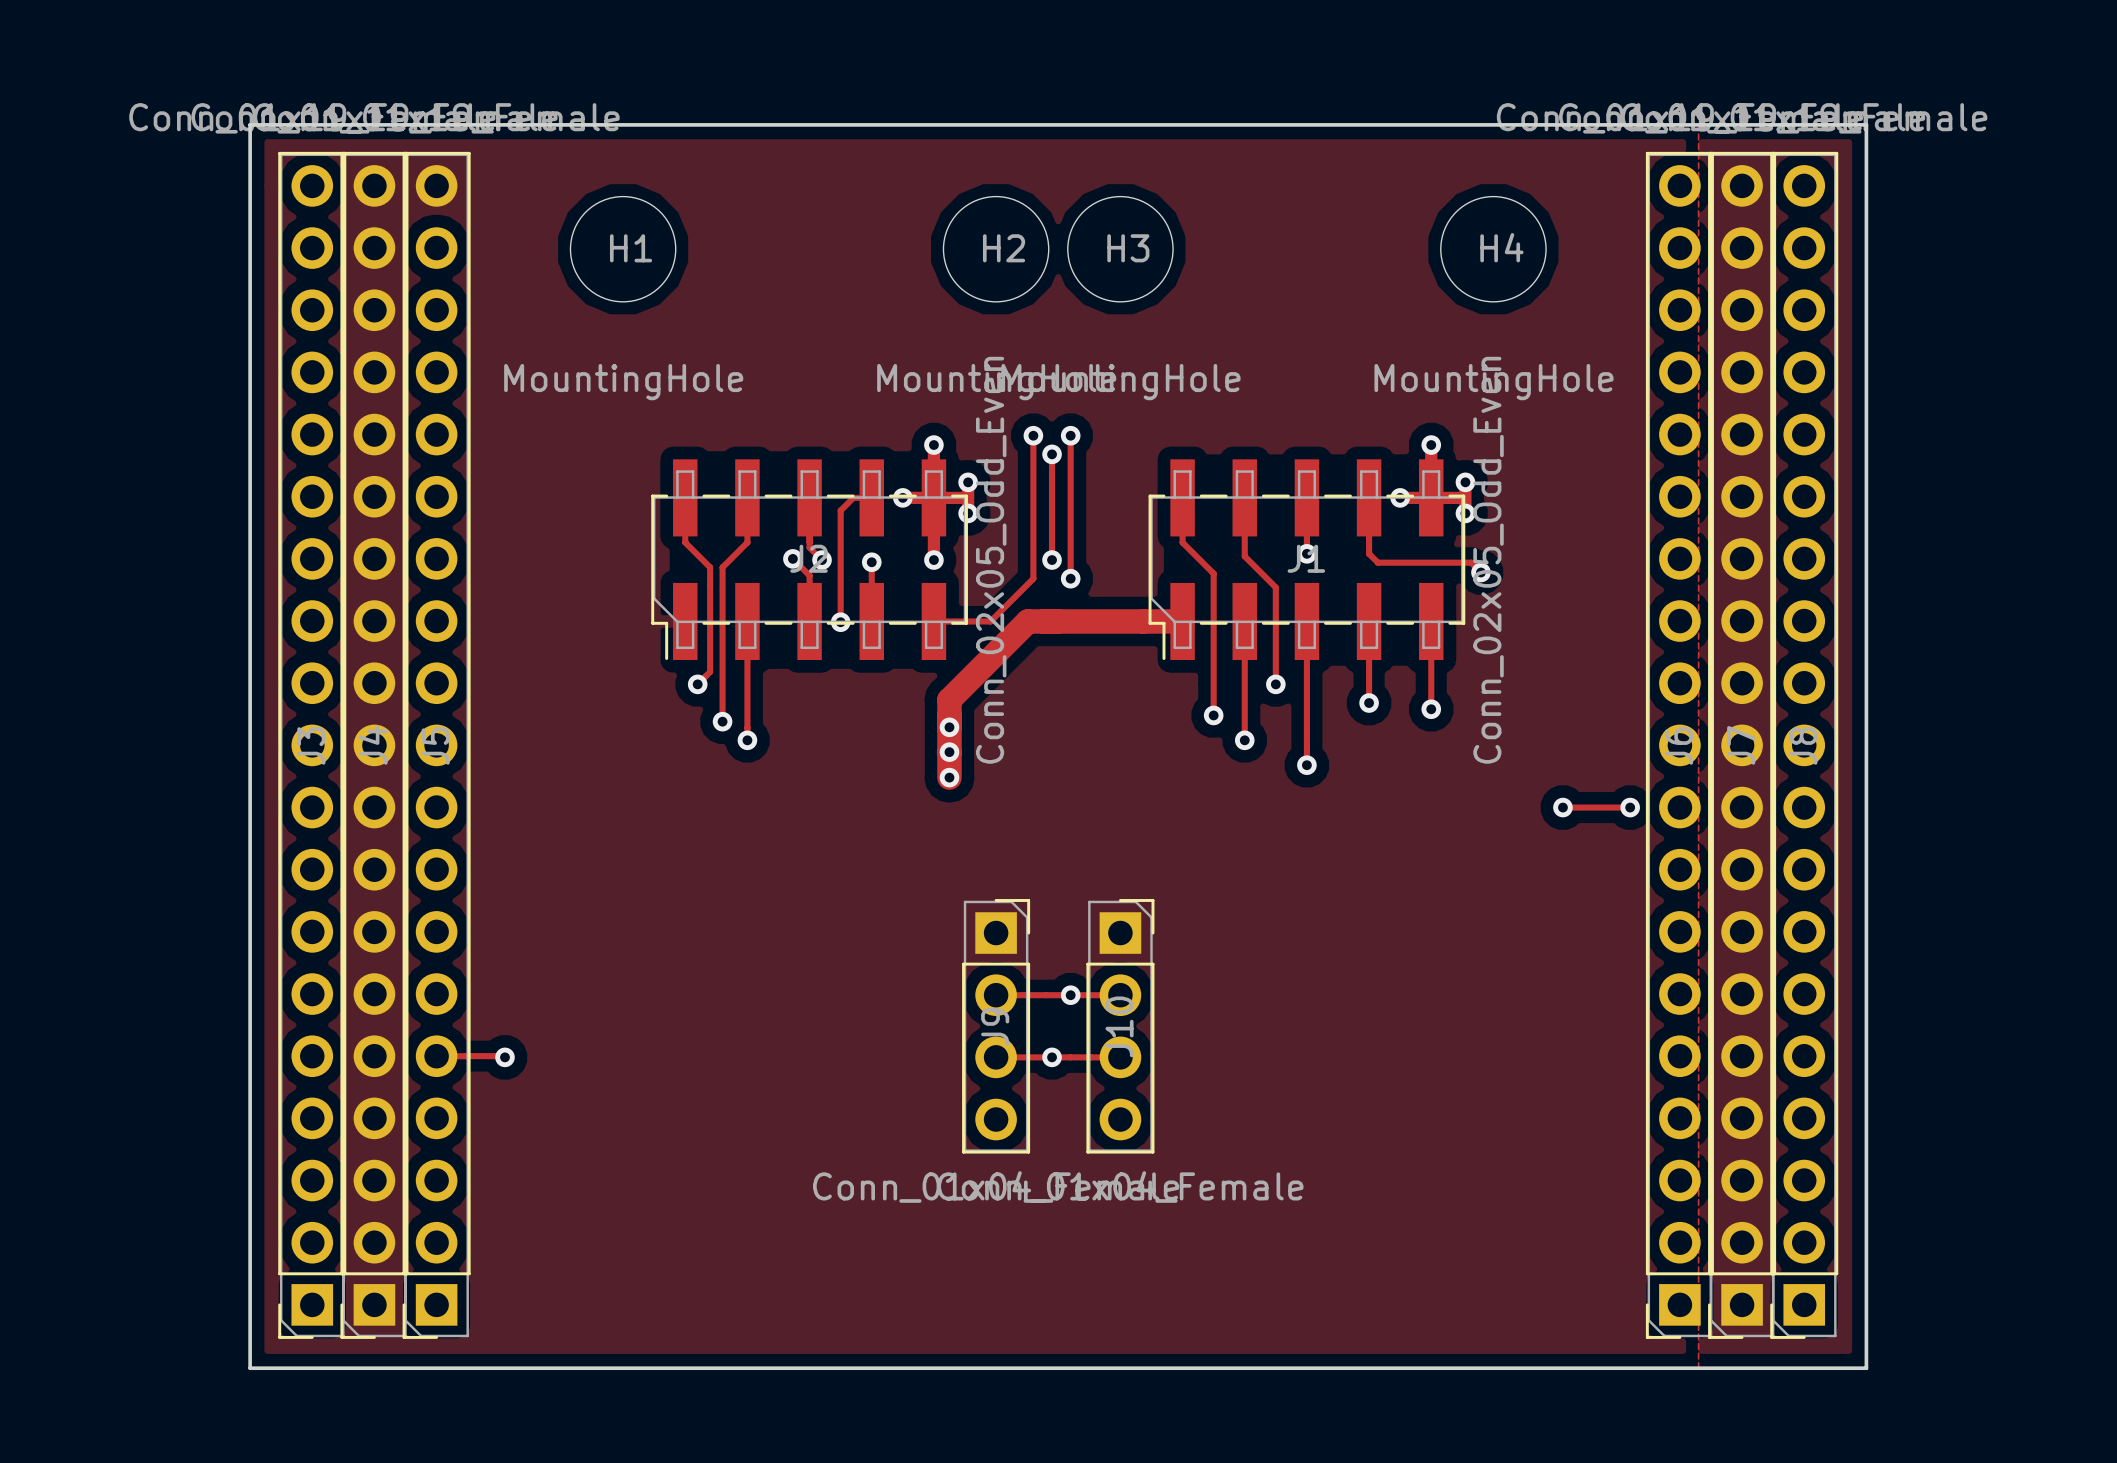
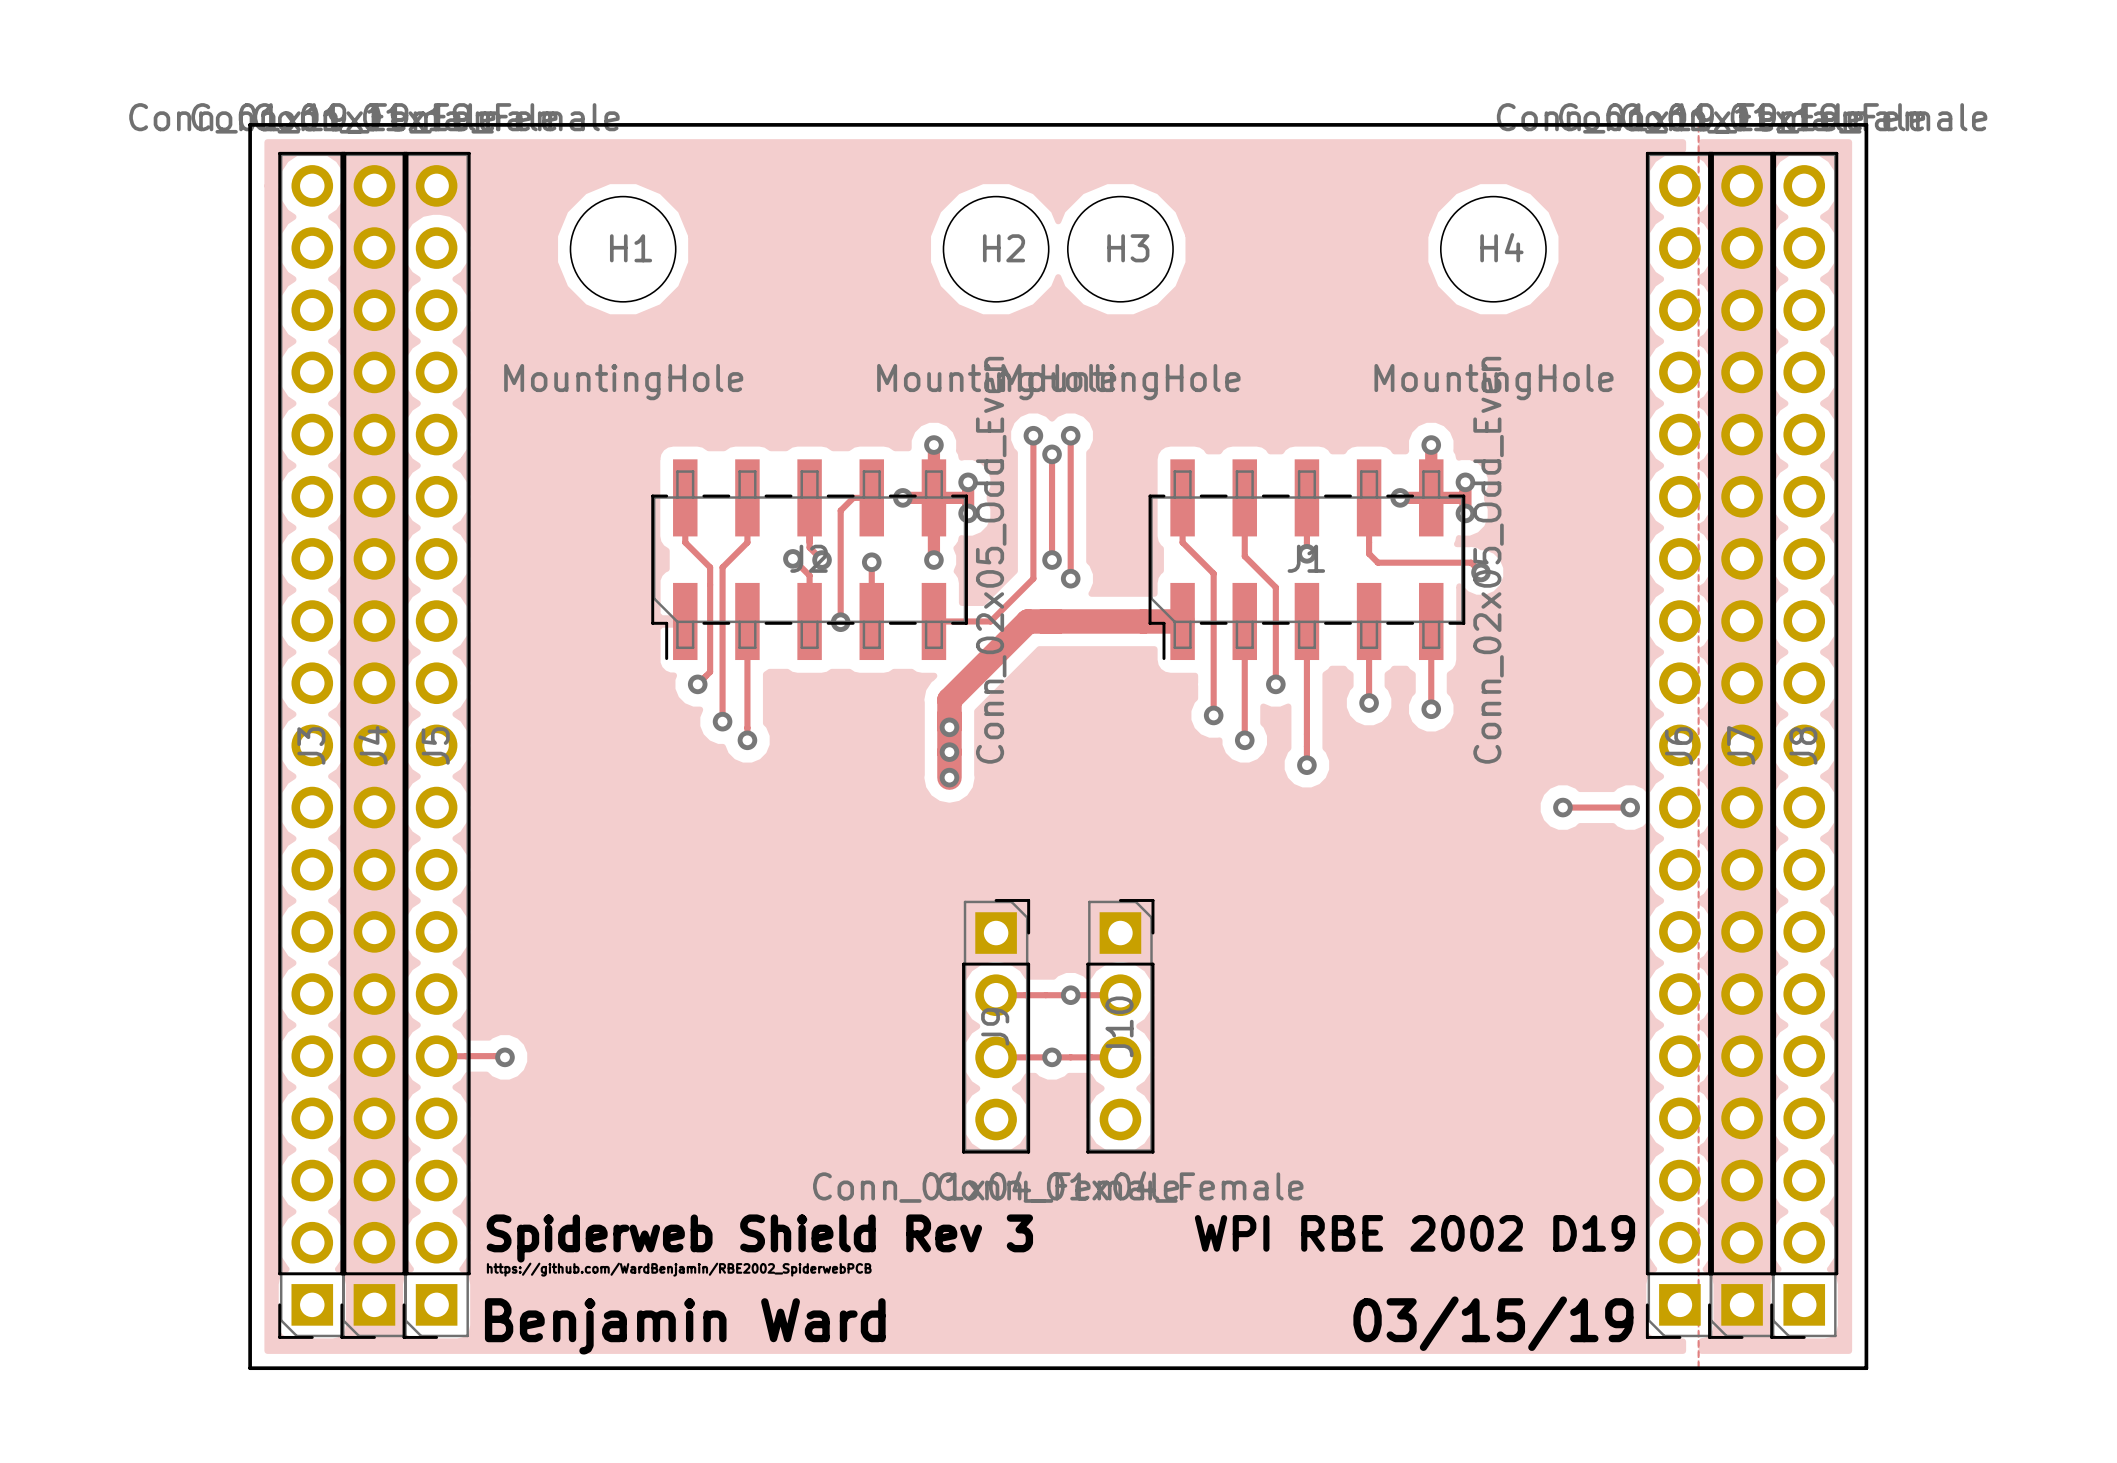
text: none -> WPI RBE 2002 D19 (1414, 1233)
text: none -> Spiderweb Shield Rev 3 (759, 1238)
text: none -> https://github.com/WardBenjamin/RBE2002_SpiderwebPCB (679, 1269)
text: none -> 03/15/19 (1493, 1323)
text: none -> Benjamin Ward (685, 1326)

